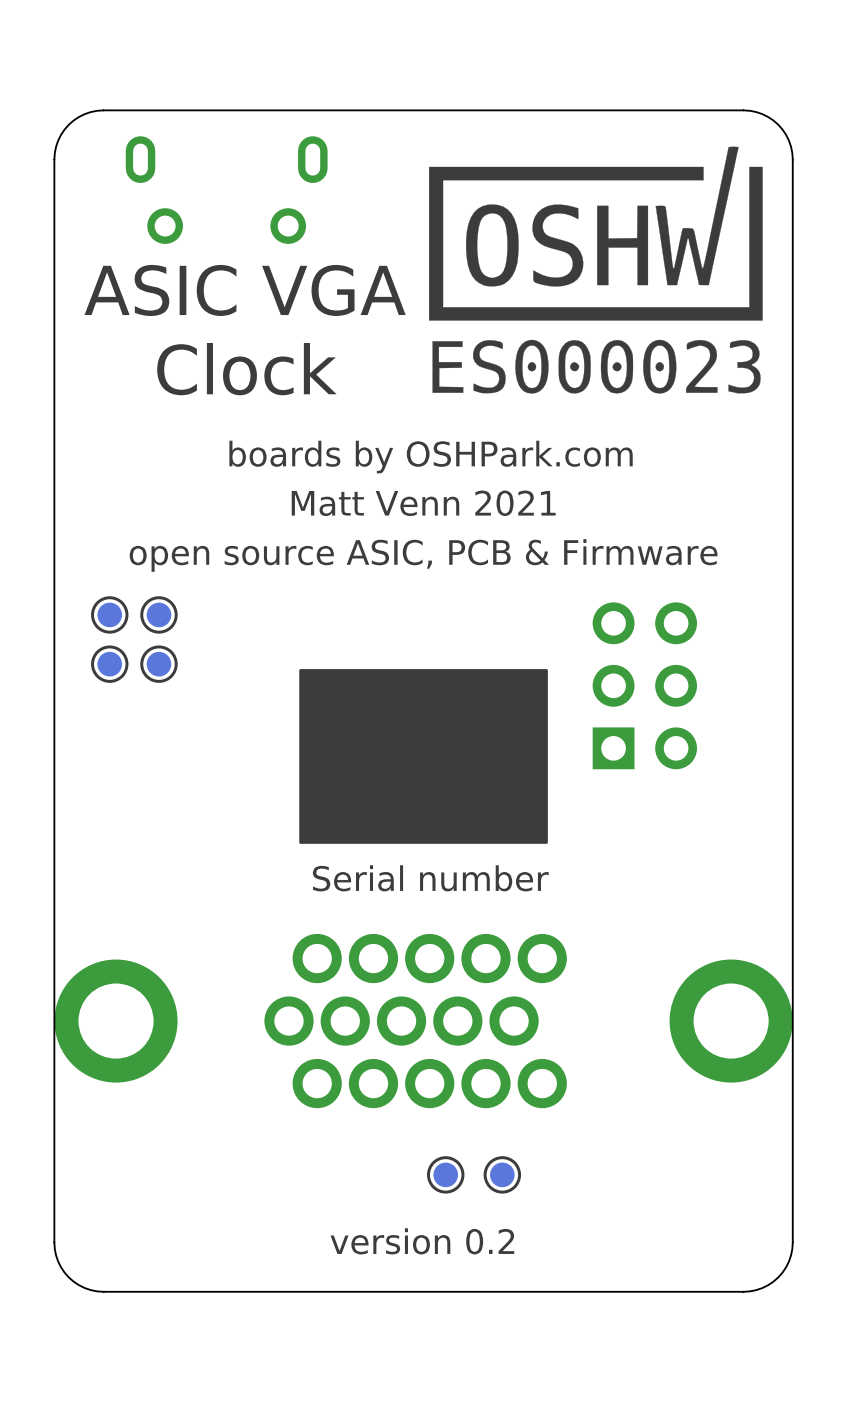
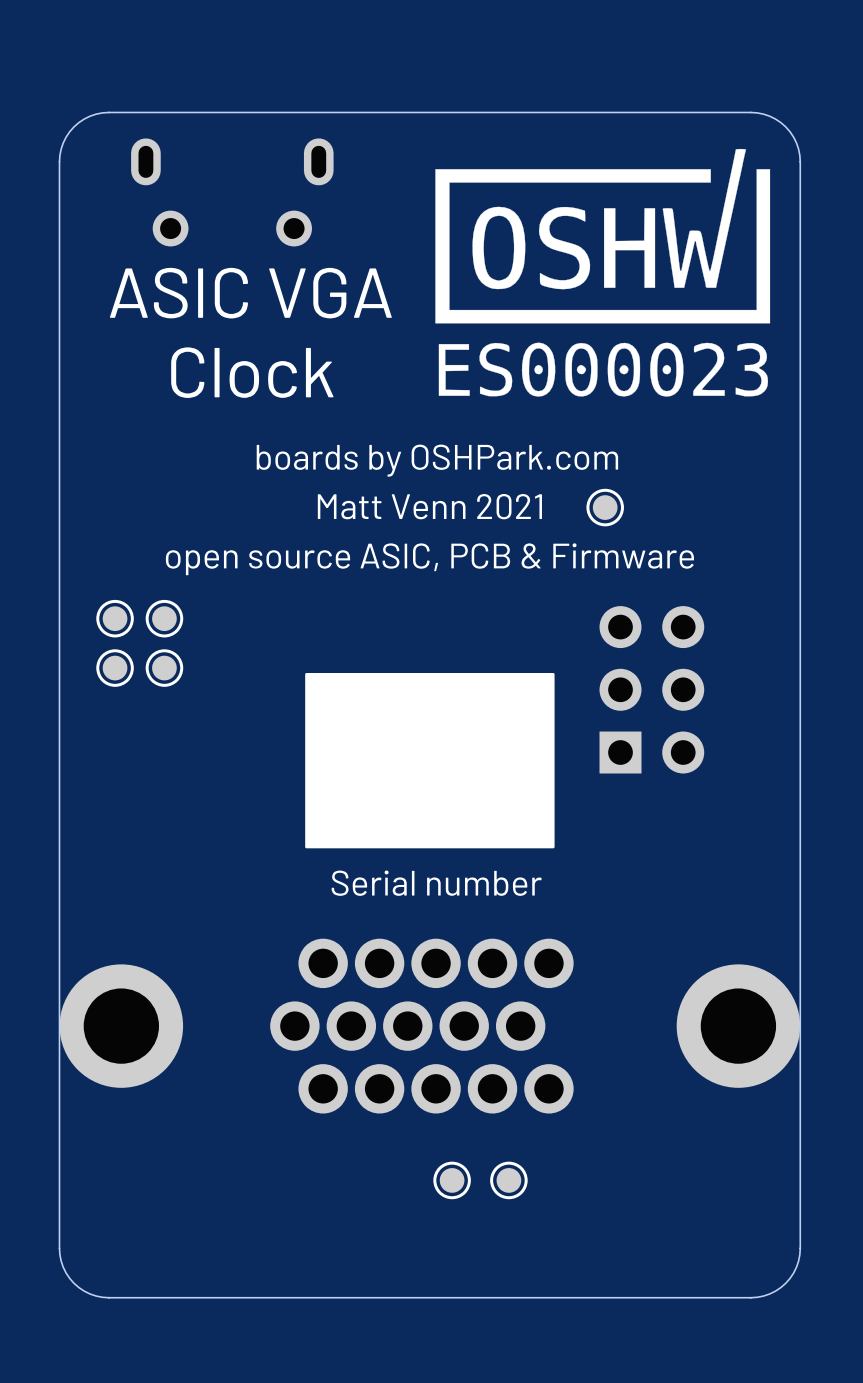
part: none -> (605, 507)
text: version 0.2 (422, 1241) -> none

